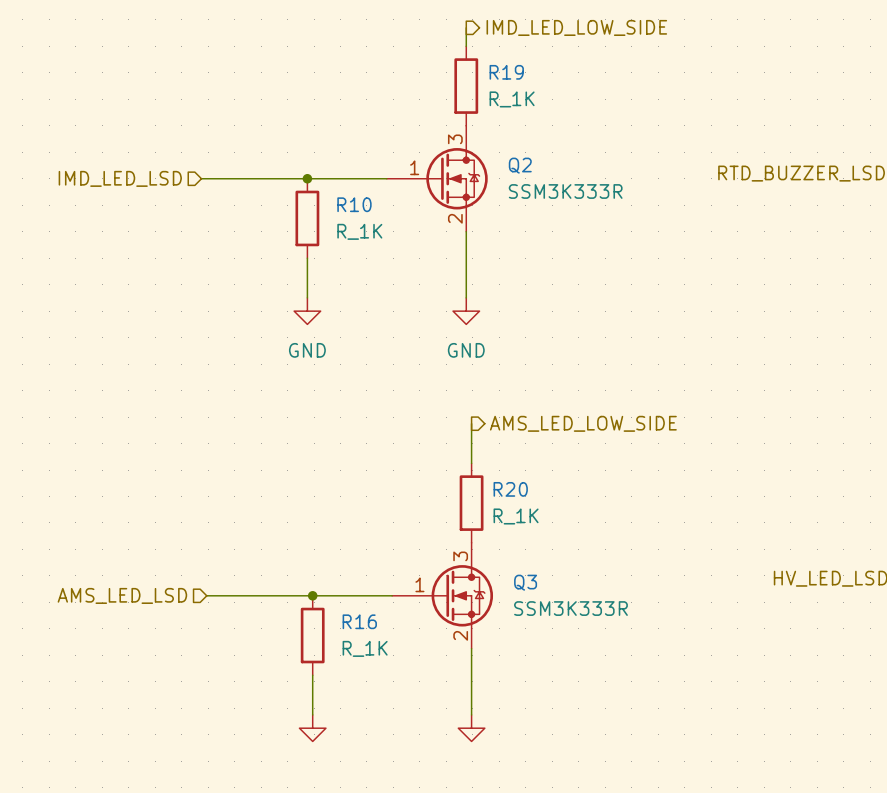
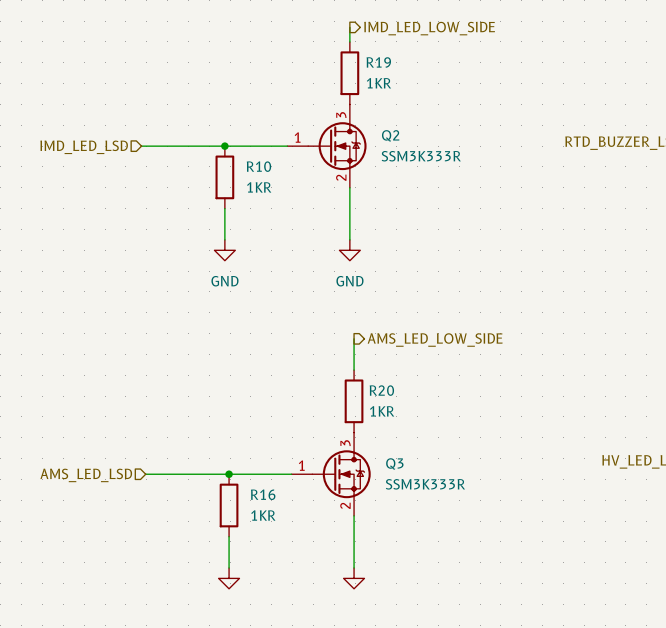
R19 value: R_1K (512, 99) -> 1KR (378, 83)
Q2 symbol: [386, 125, 488, 232] -> [287, 104, 367, 188]
R10 value: R_1K (359, 231) -> 1KR (259, 187)
R20 value: R_1K (516, 516) -> 1KR (382, 411)
Q3 symbol: [392, 542, 494, 649] -> [291, 432, 371, 516]
R16 value: R_1K (365, 648) -> 1KR (263, 515)

